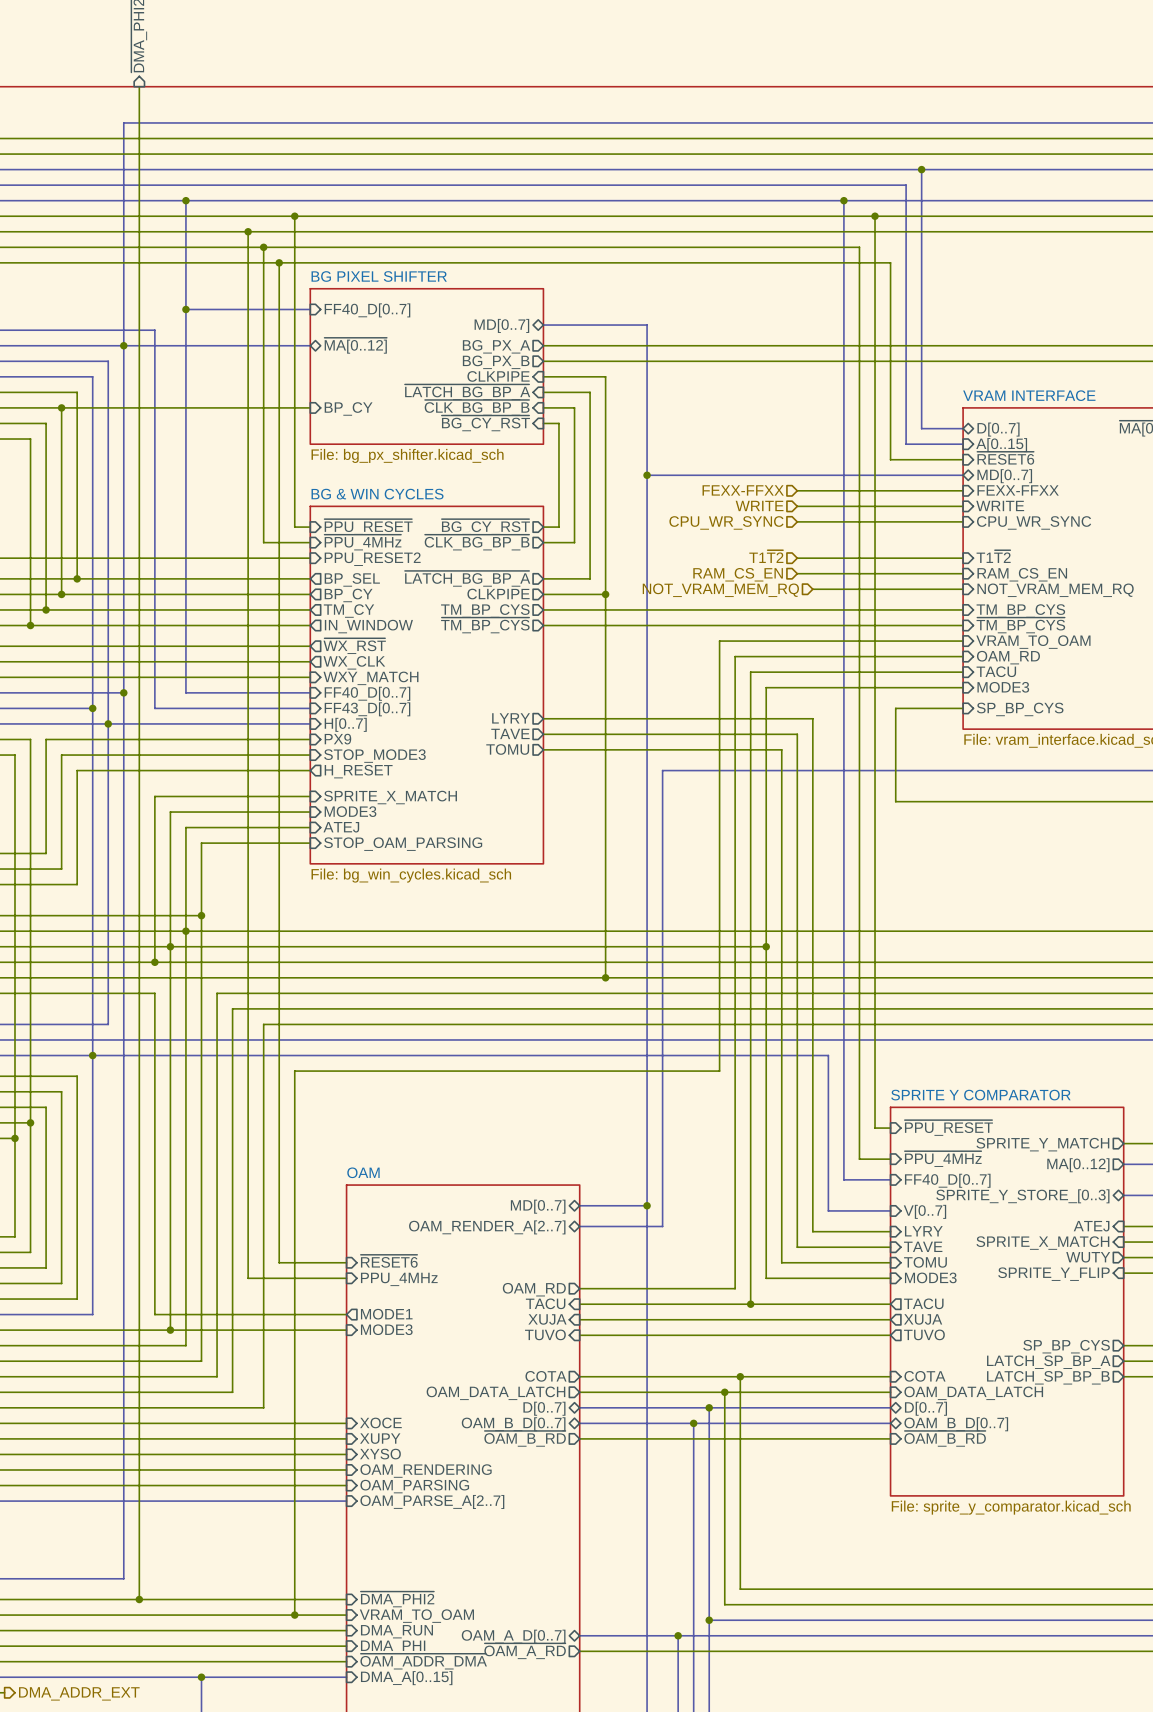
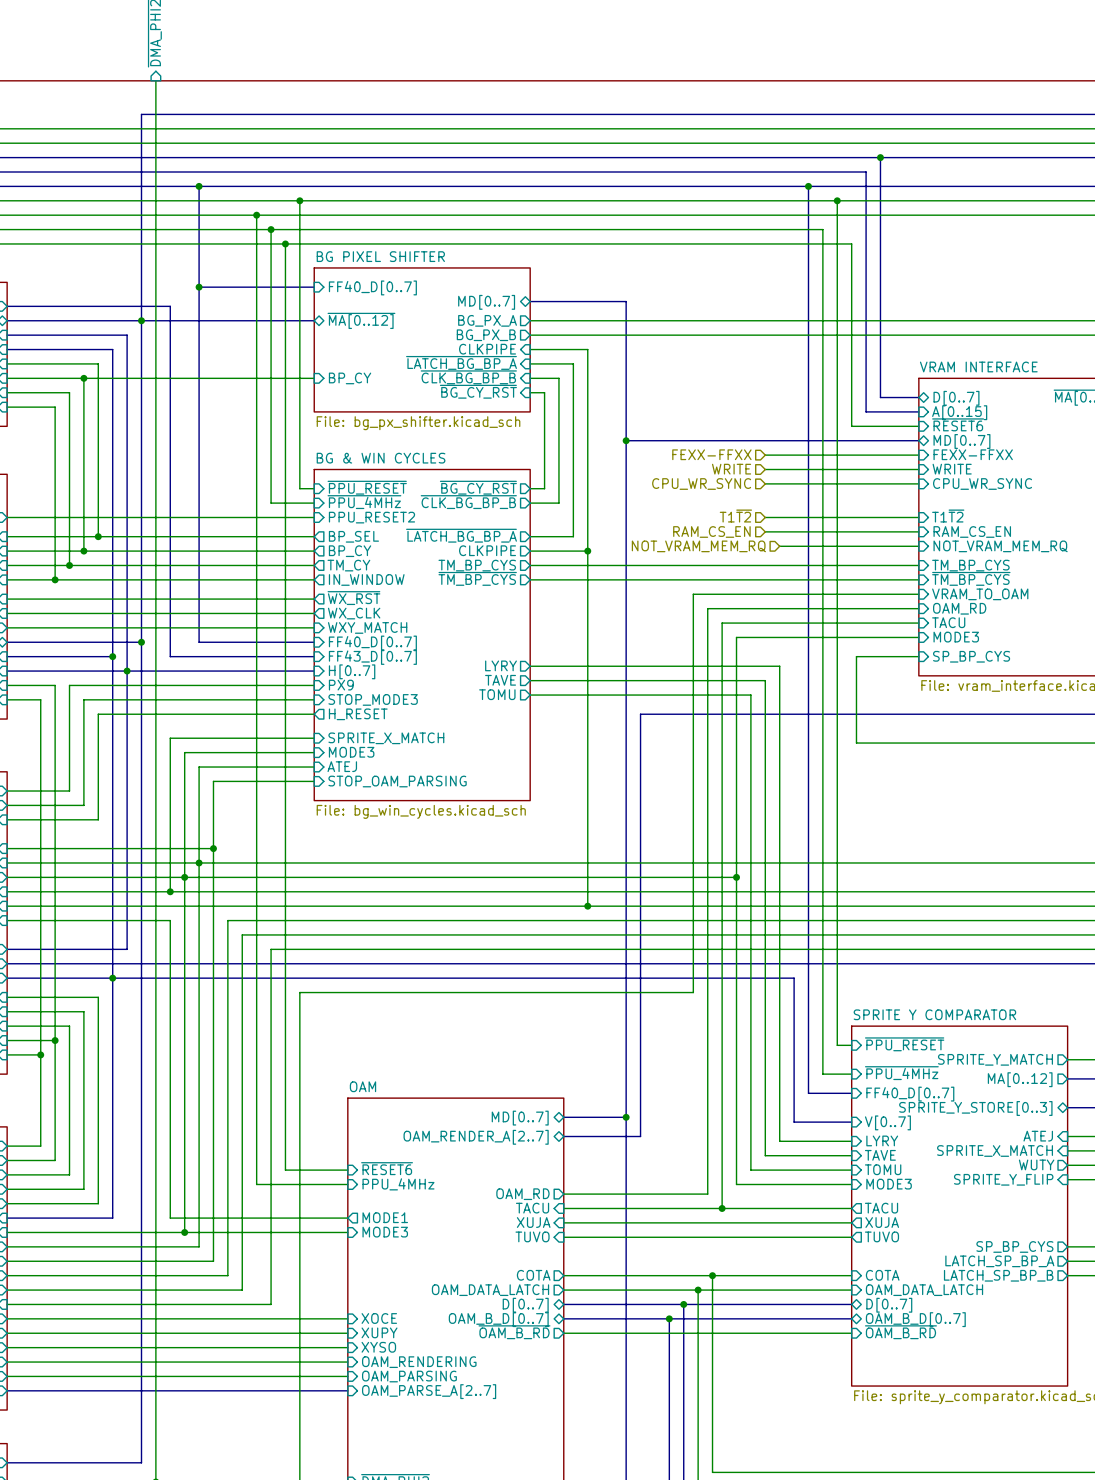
sheet pin: SPRITE_Y_STORE_[0..3] (1022, 1196) -> SPRITE_Y_STORE[0..3] (975, 1108)

